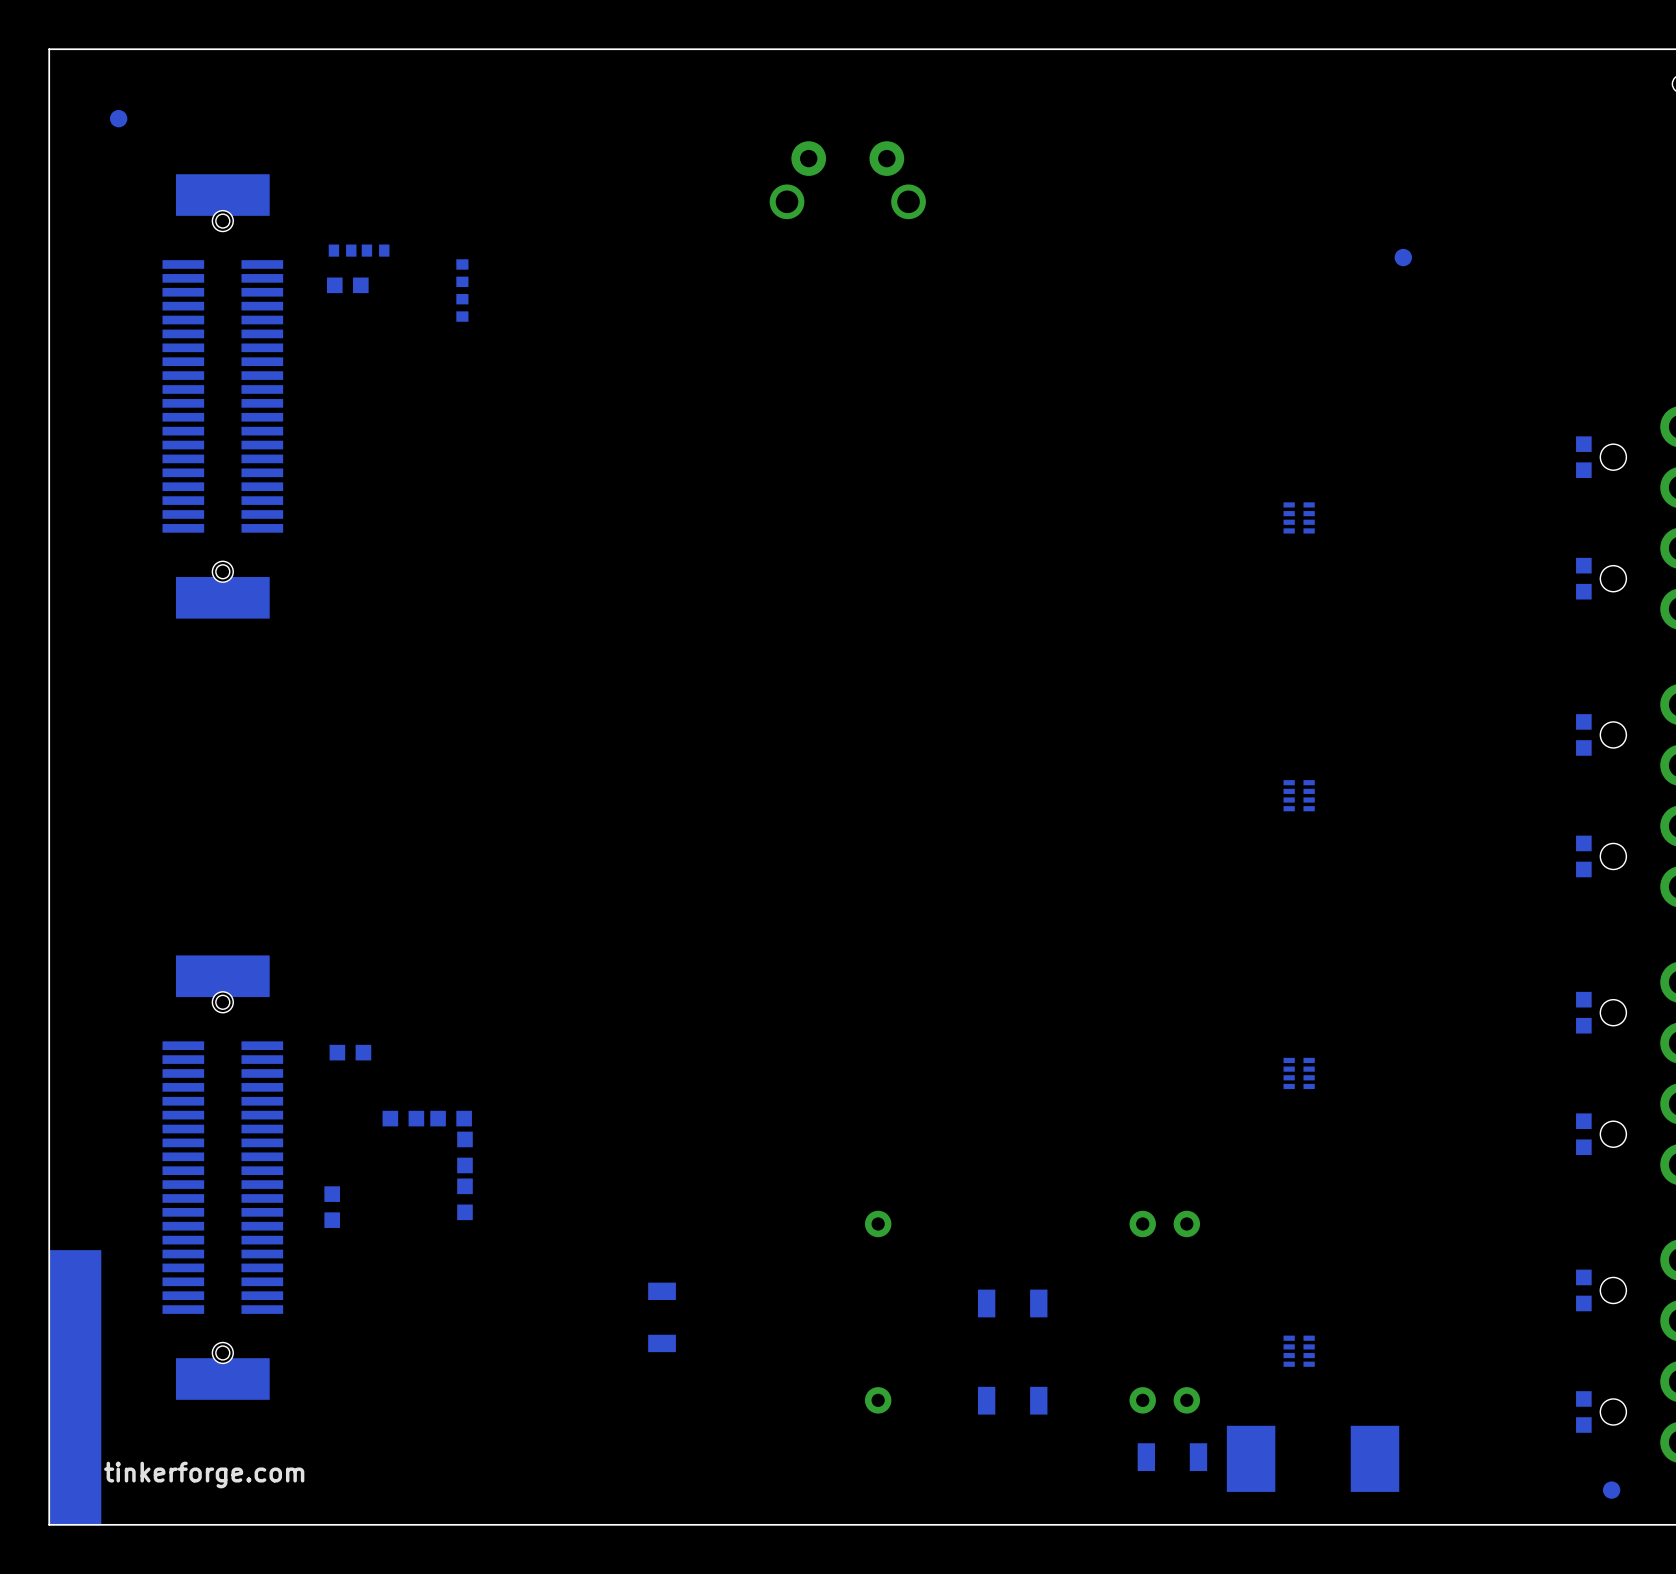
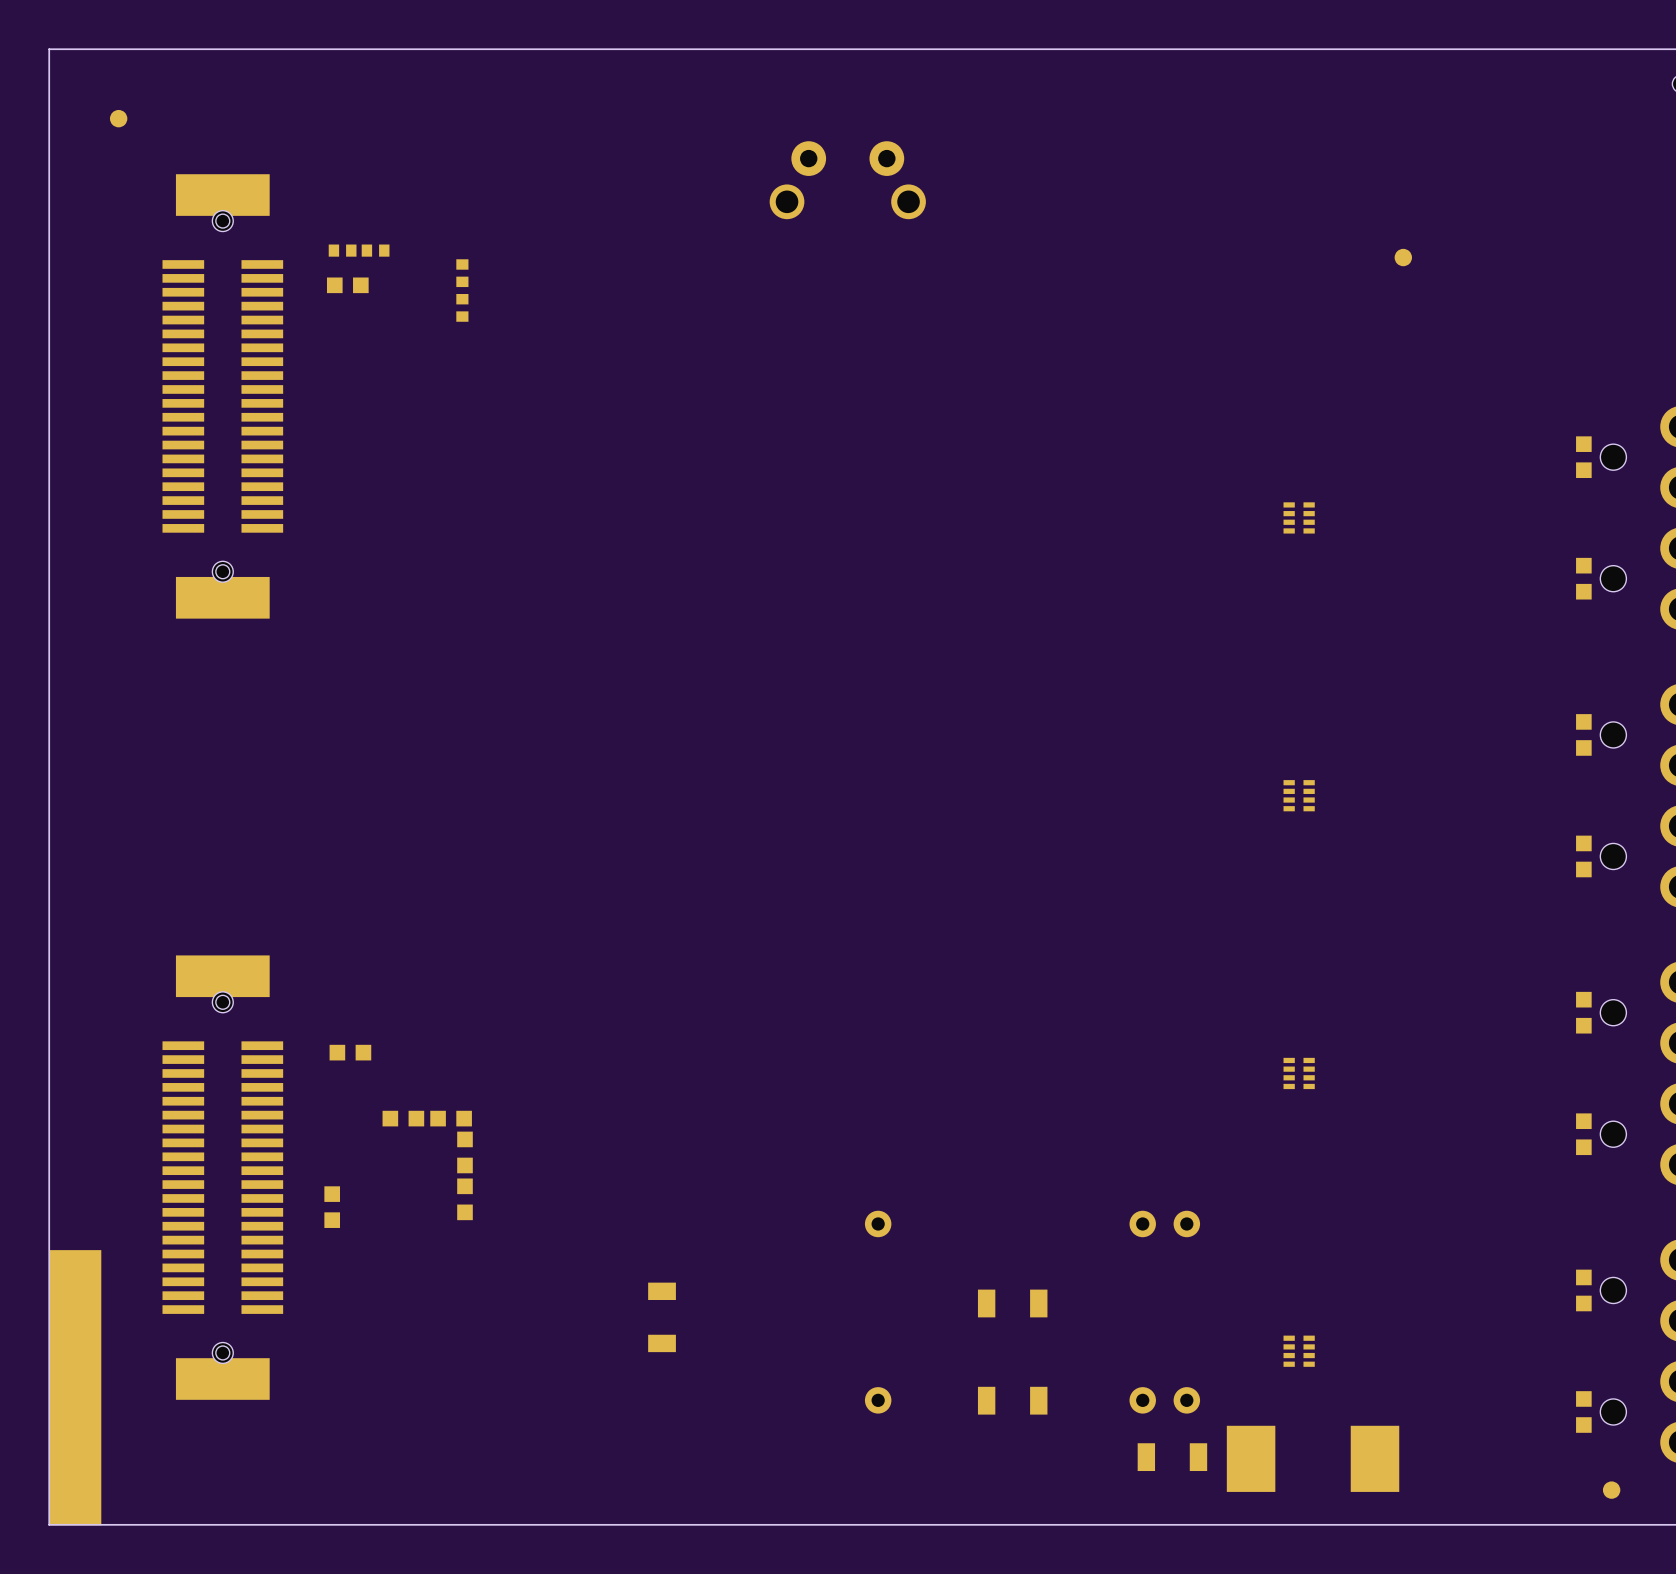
text: tinkerforge.com (204, 1474) -> none

